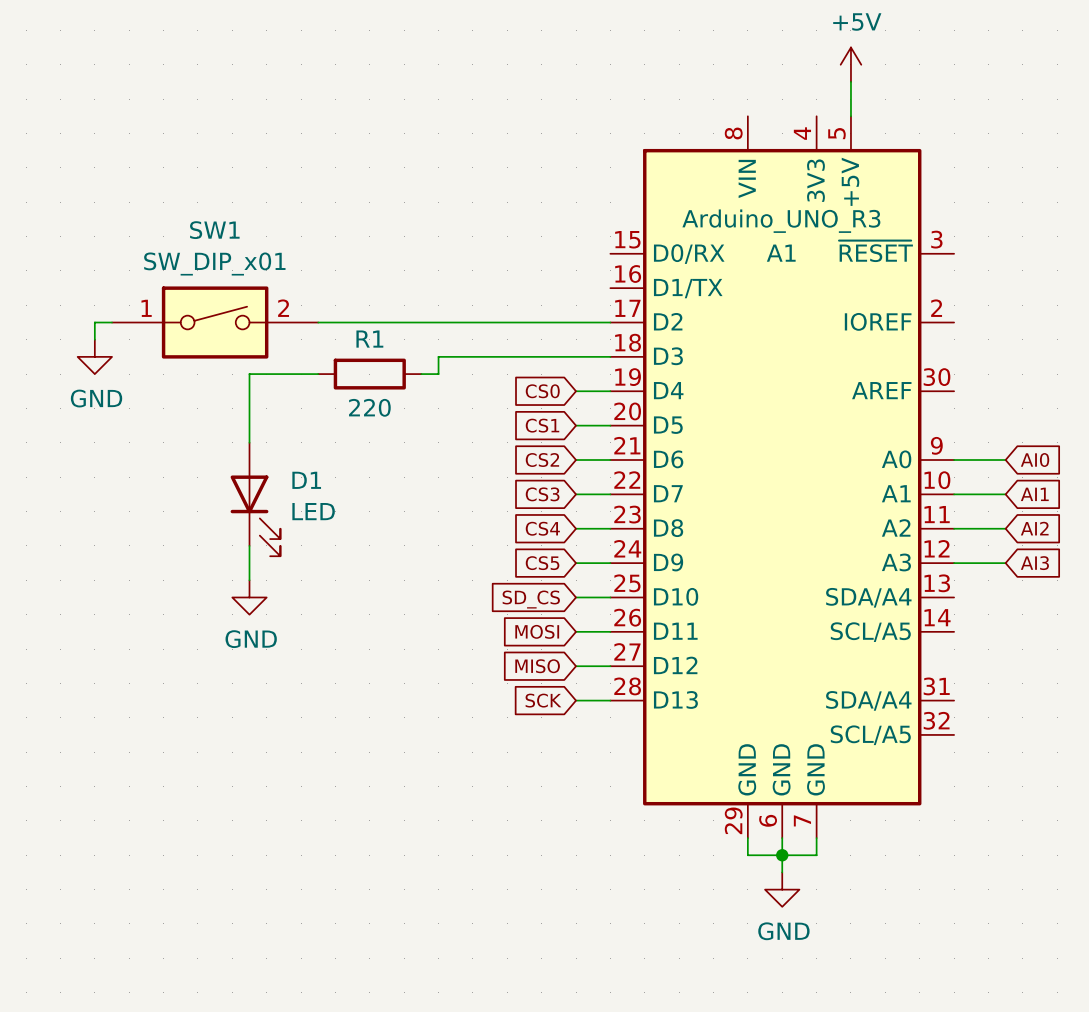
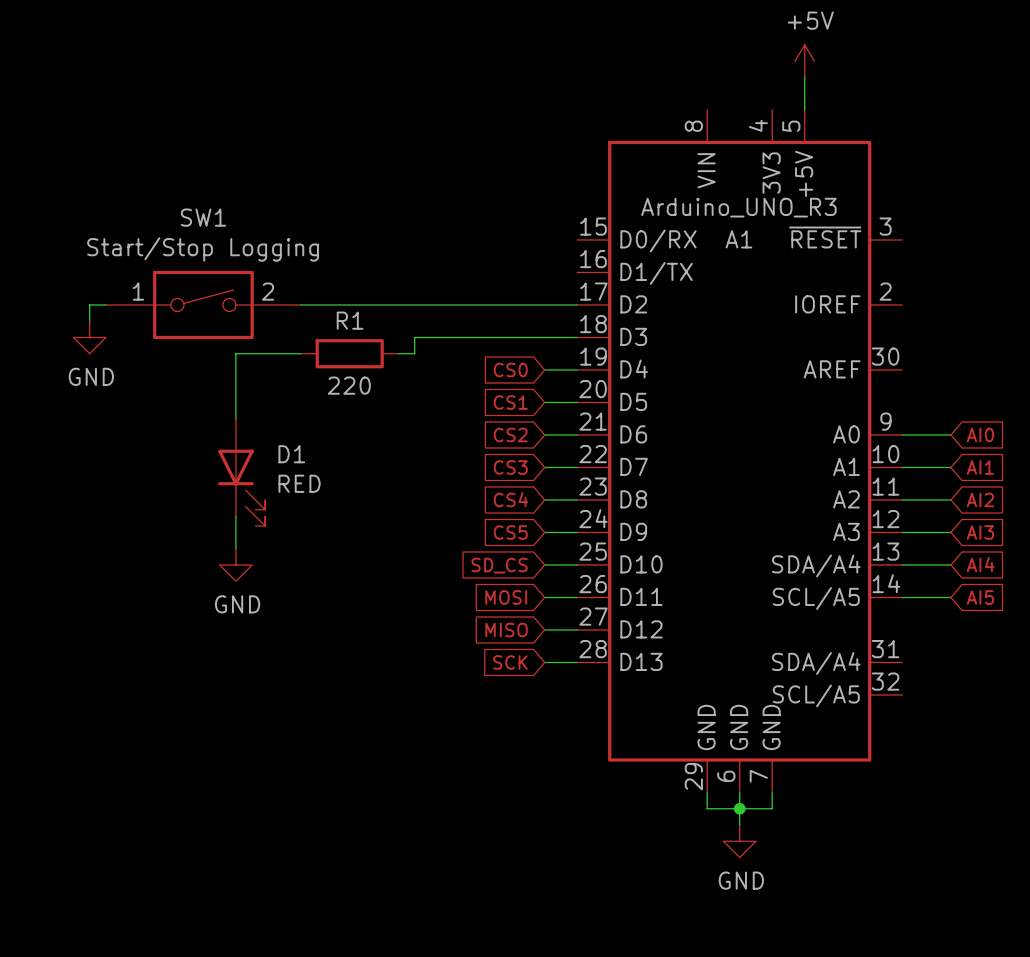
SW1 value: SW_DIP_x01 (214, 264) -> Start/Stop Logging (203, 249)
D1 value: LED (313, 511) -> RED (299, 483)
wire: none -> (902, 564) (950, 564)
global label: none -> AI4 (980, 564)
wire: none -> (902, 597) (950, 597)
global label: none -> AI5 (980, 597)

